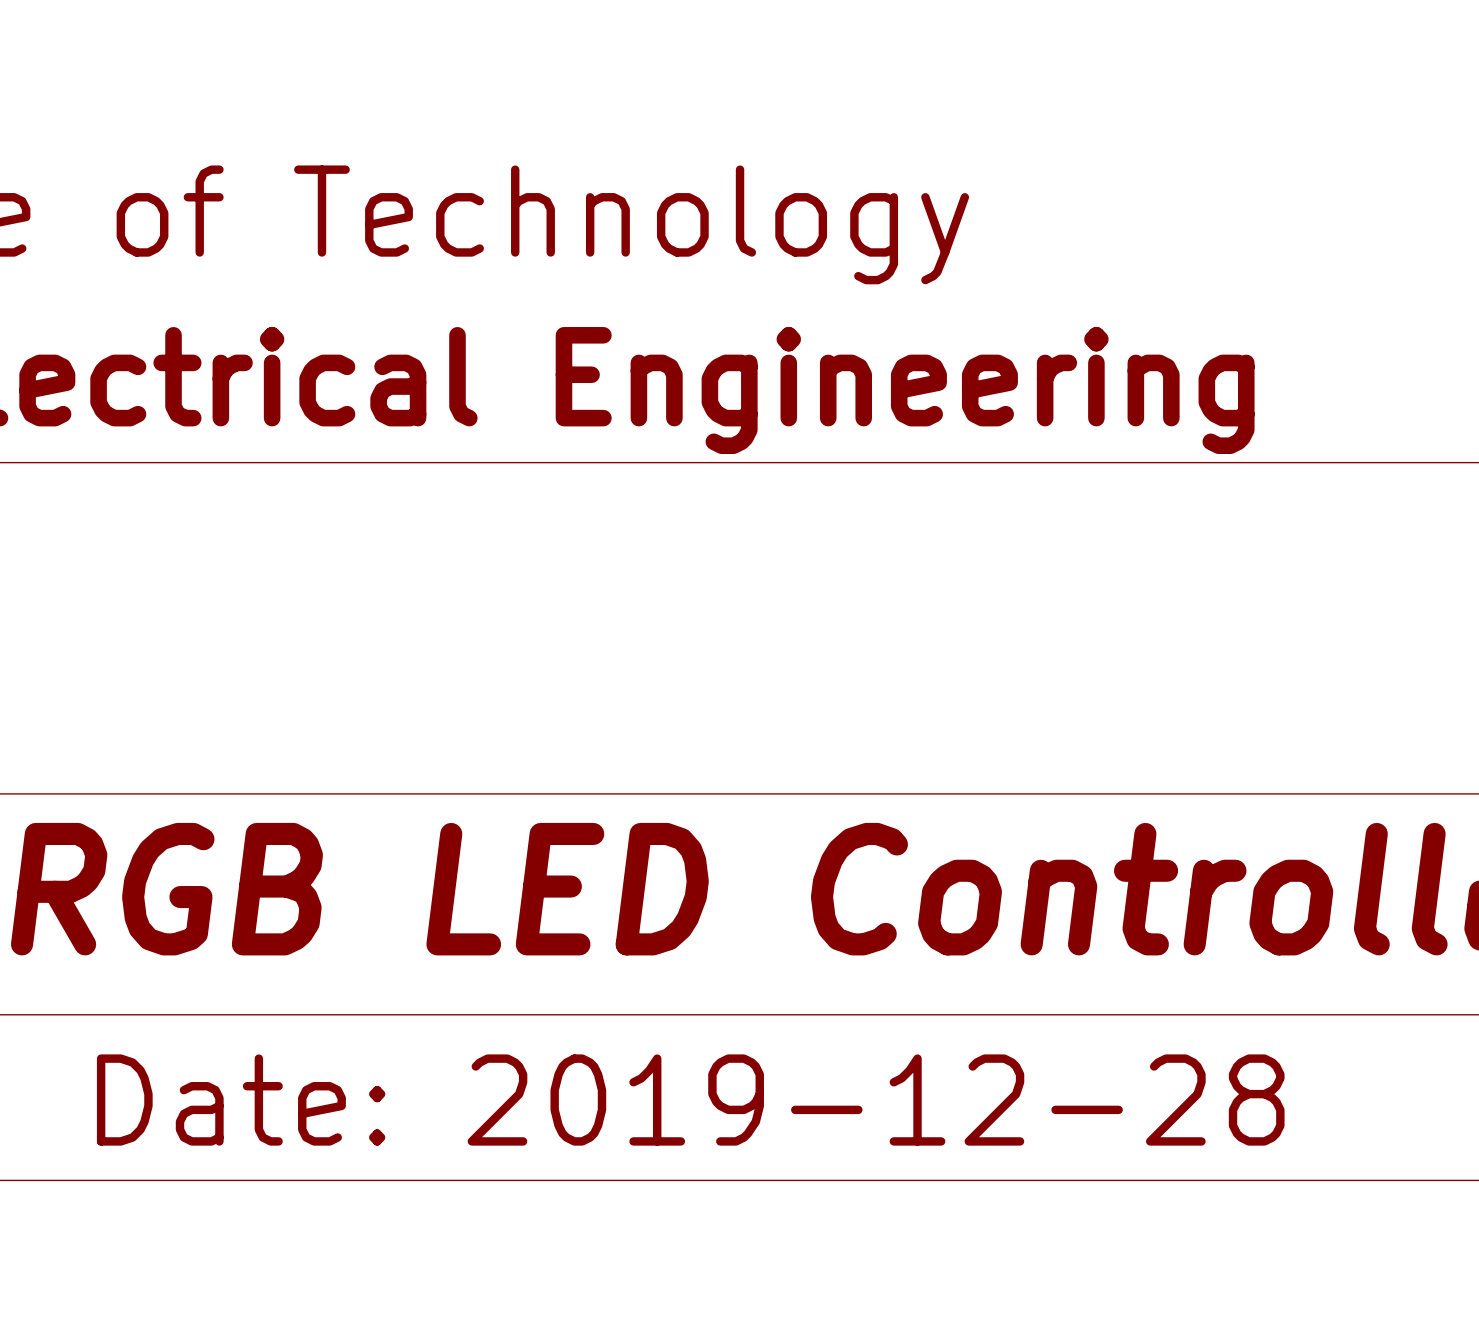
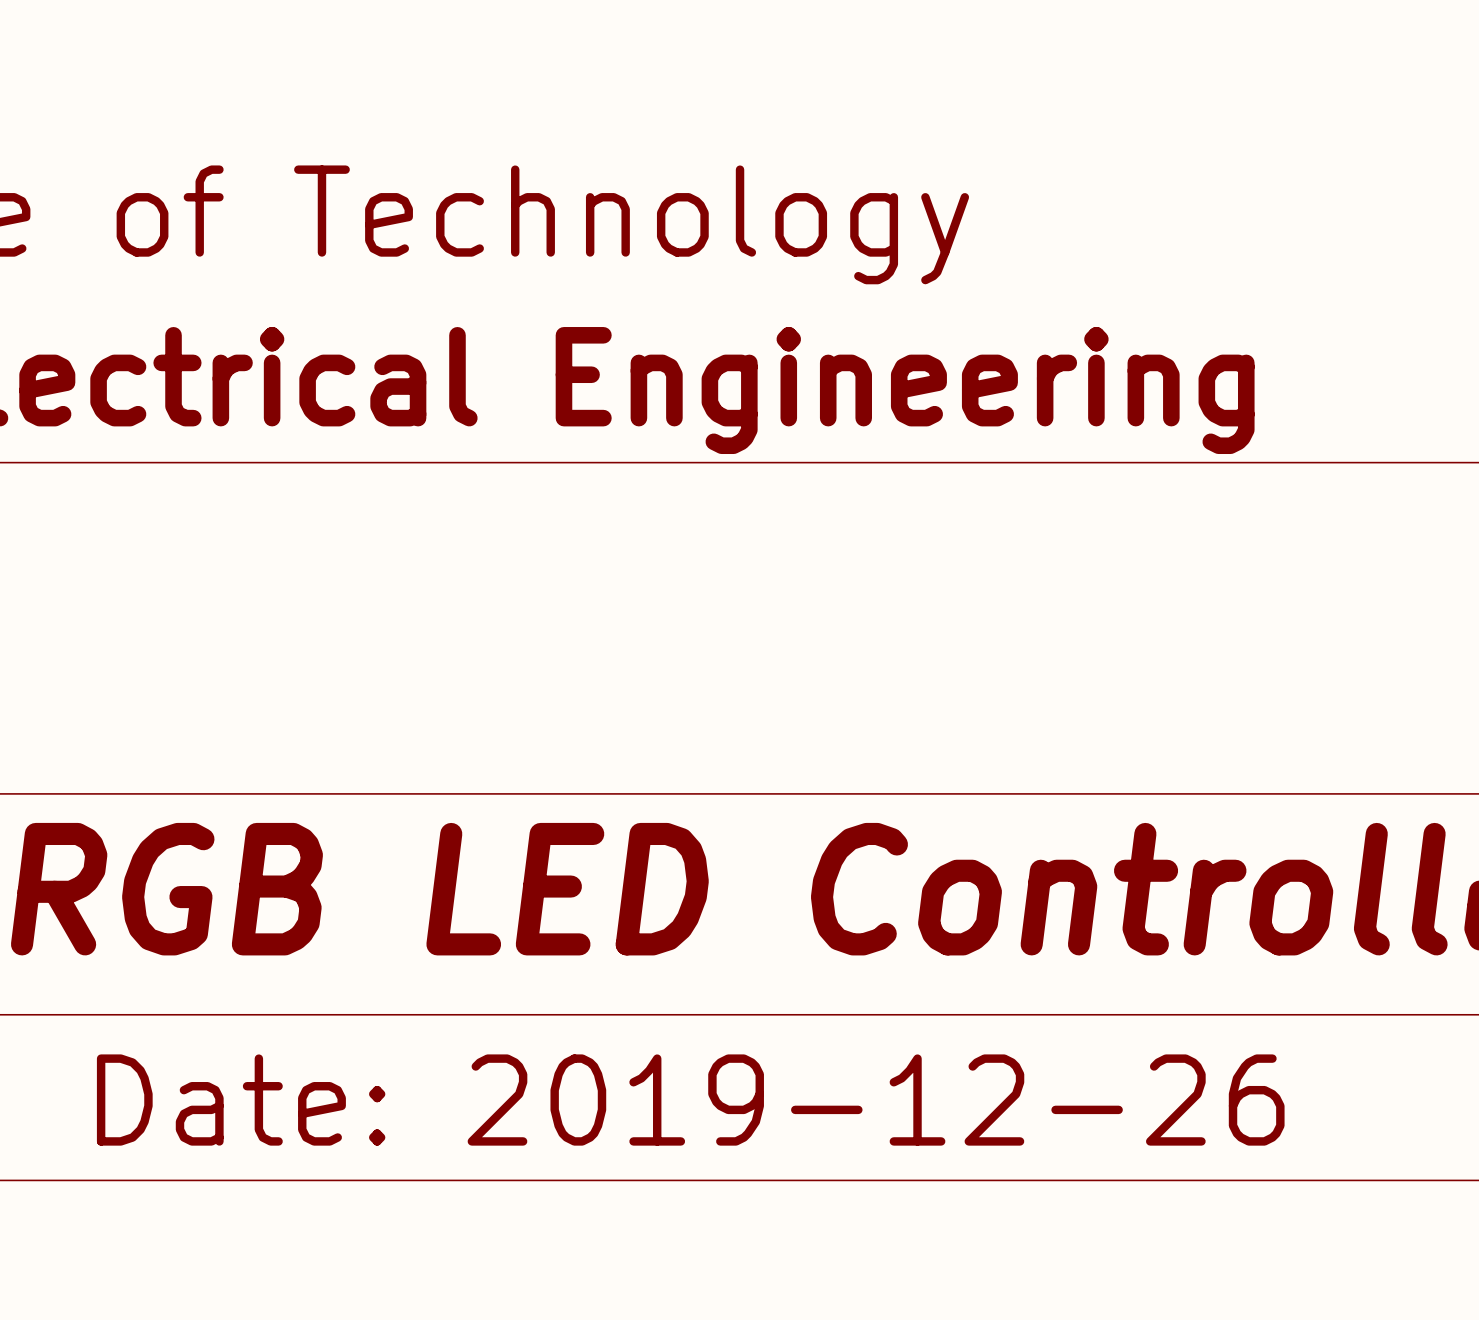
title block: Date: 2019-12-28 (690, 1100) -> Date: 2019-12-26 (690, 1100)

